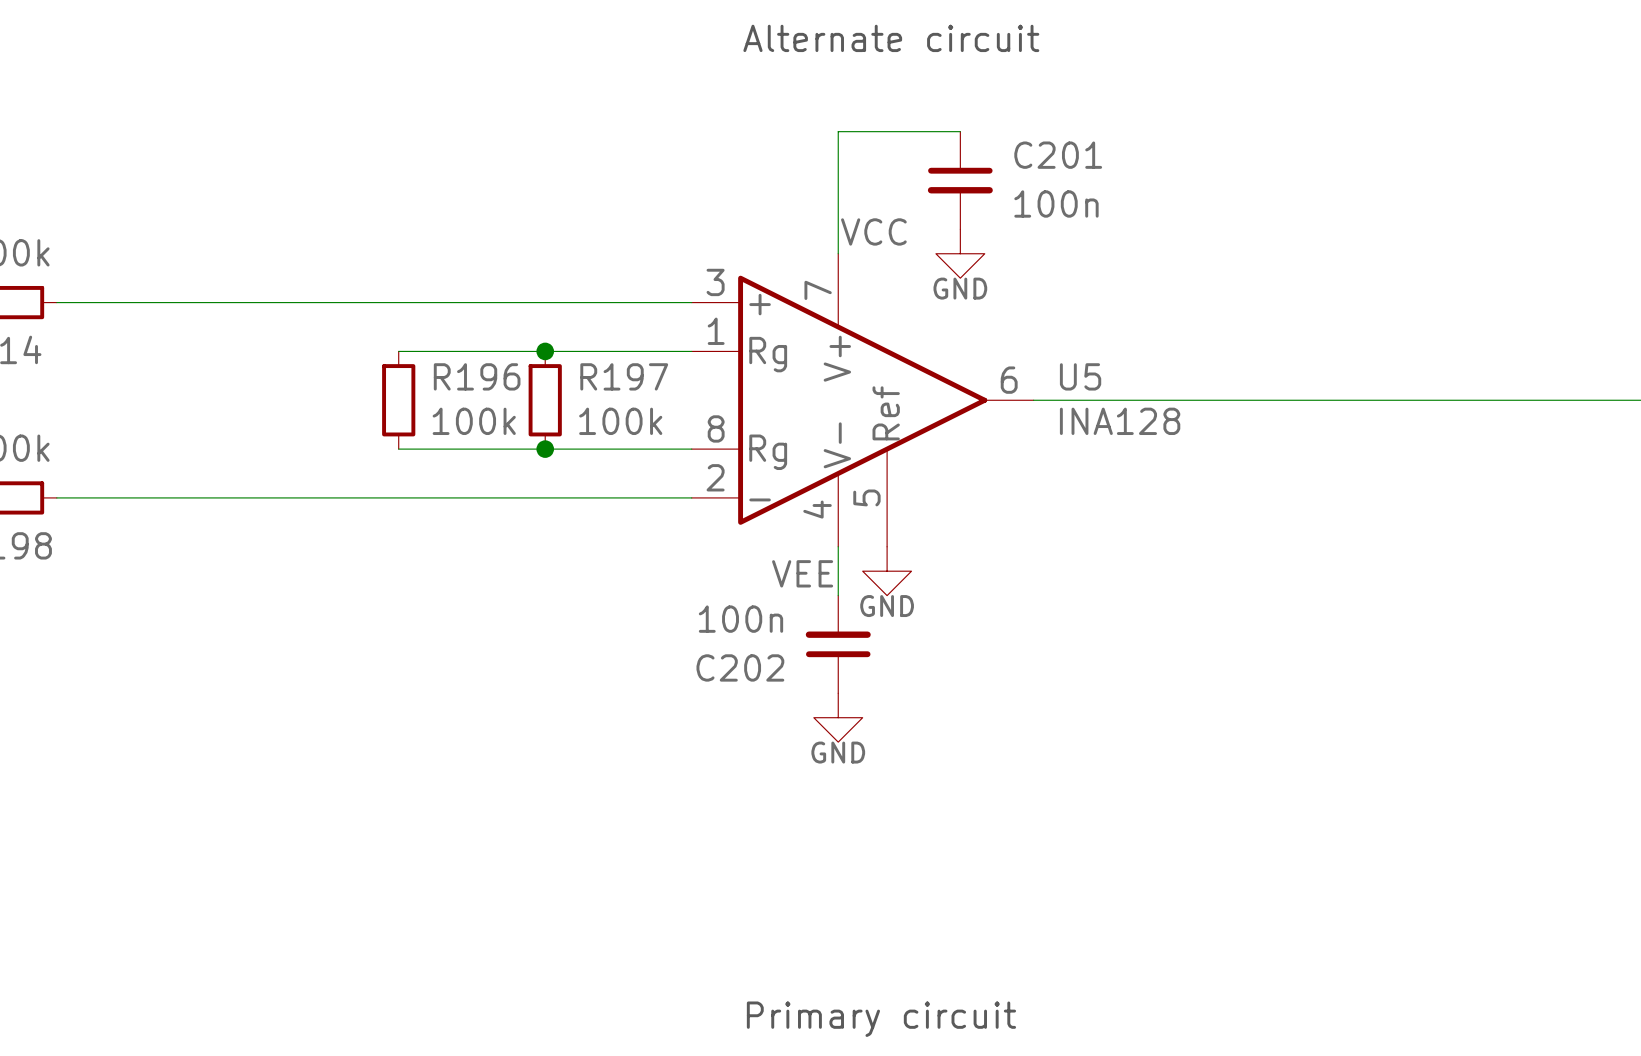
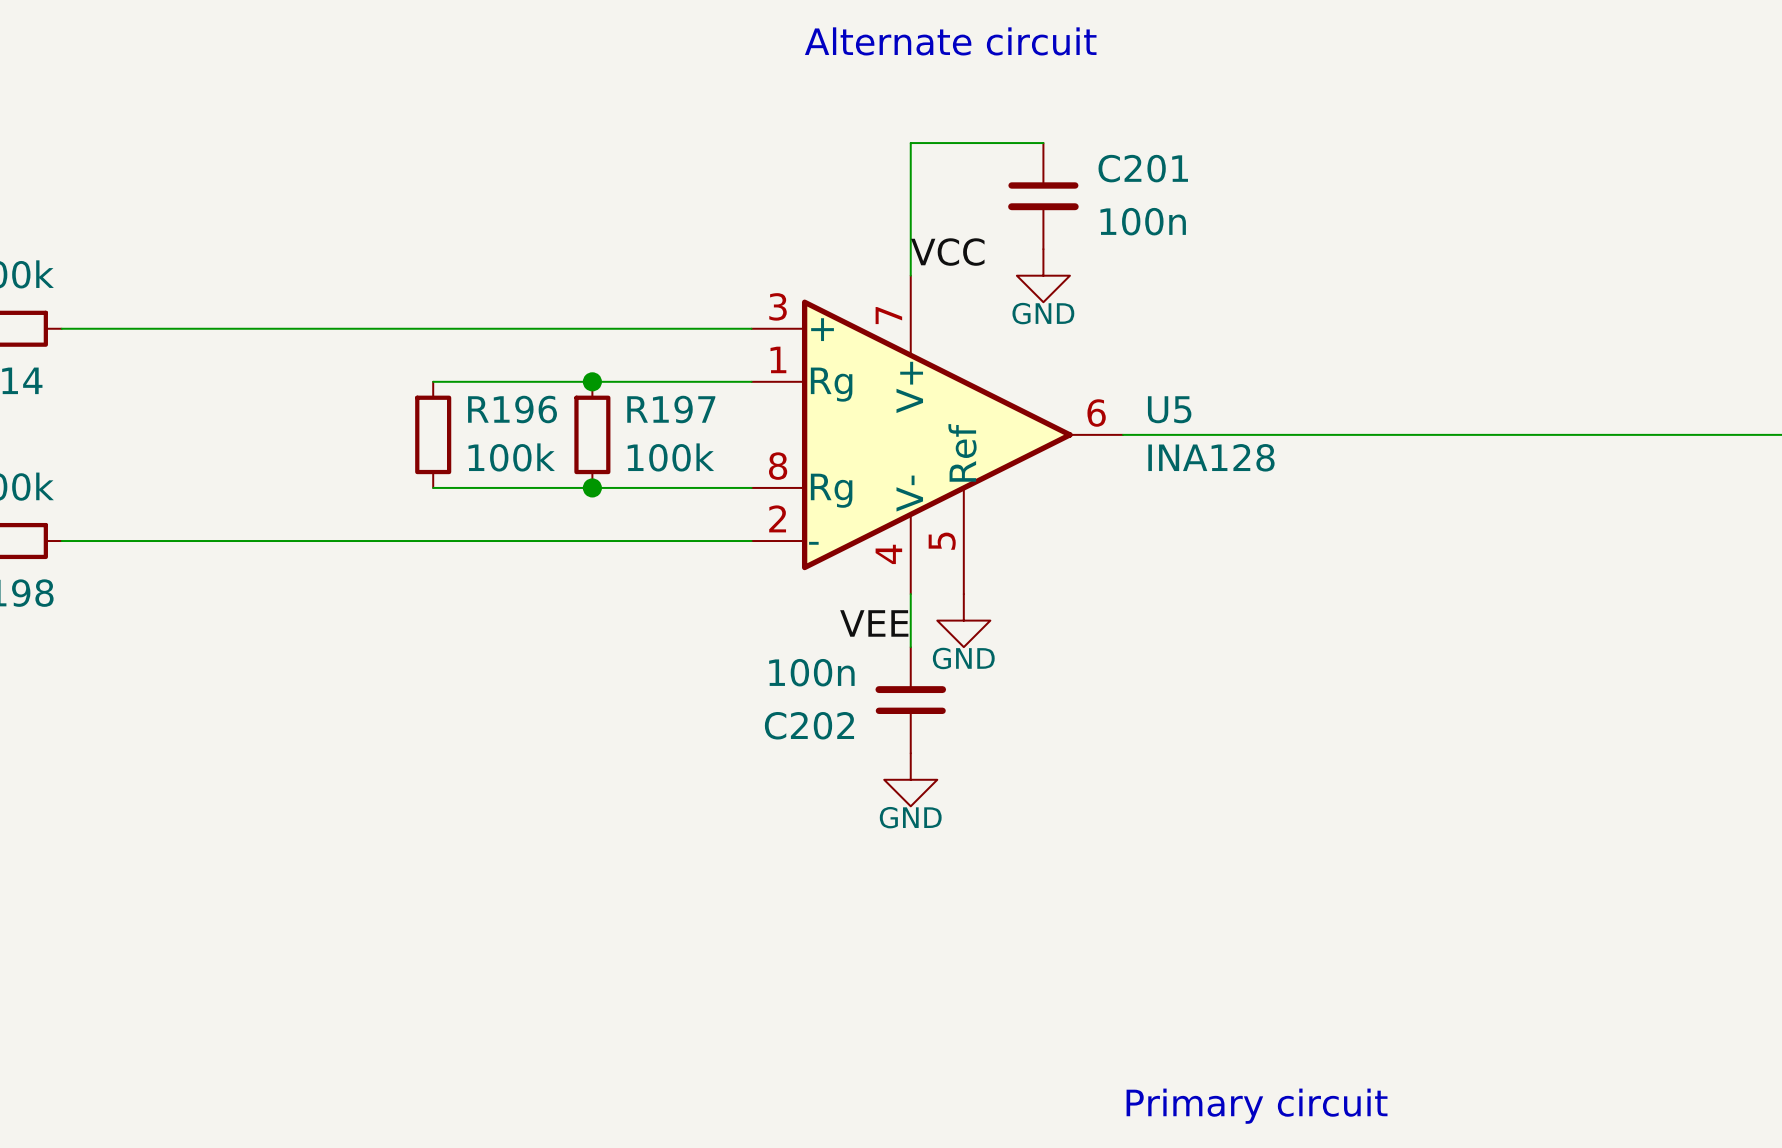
text position: Primary circuit (881, 1019) -> Primary circuit (1257, 1106)

